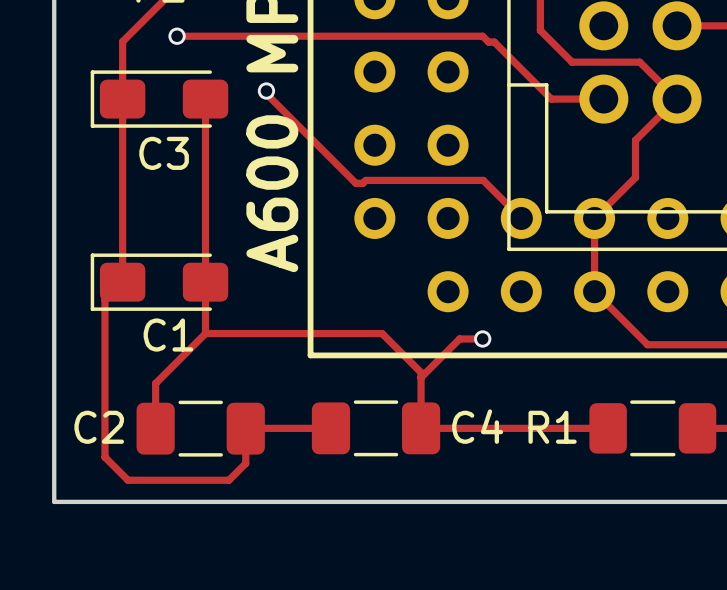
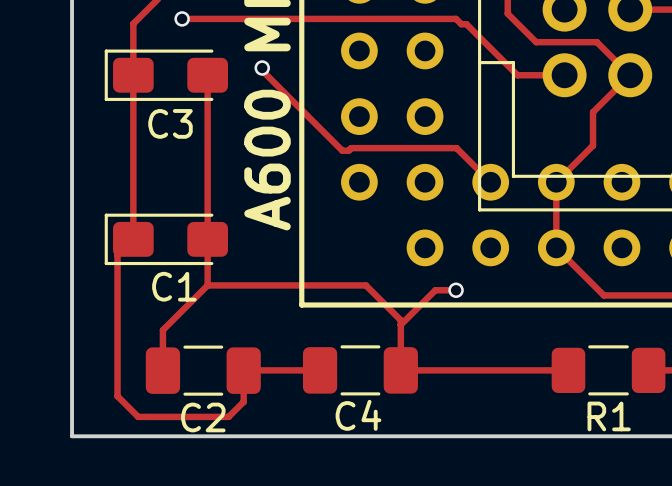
C4 name position: C4 (477, 426) -> C4 (358, 415)
C2 name position: C2 (99, 427) -> C2 (203, 417)
R1 name position: R1 (552, 427) -> R1 (609, 416)

